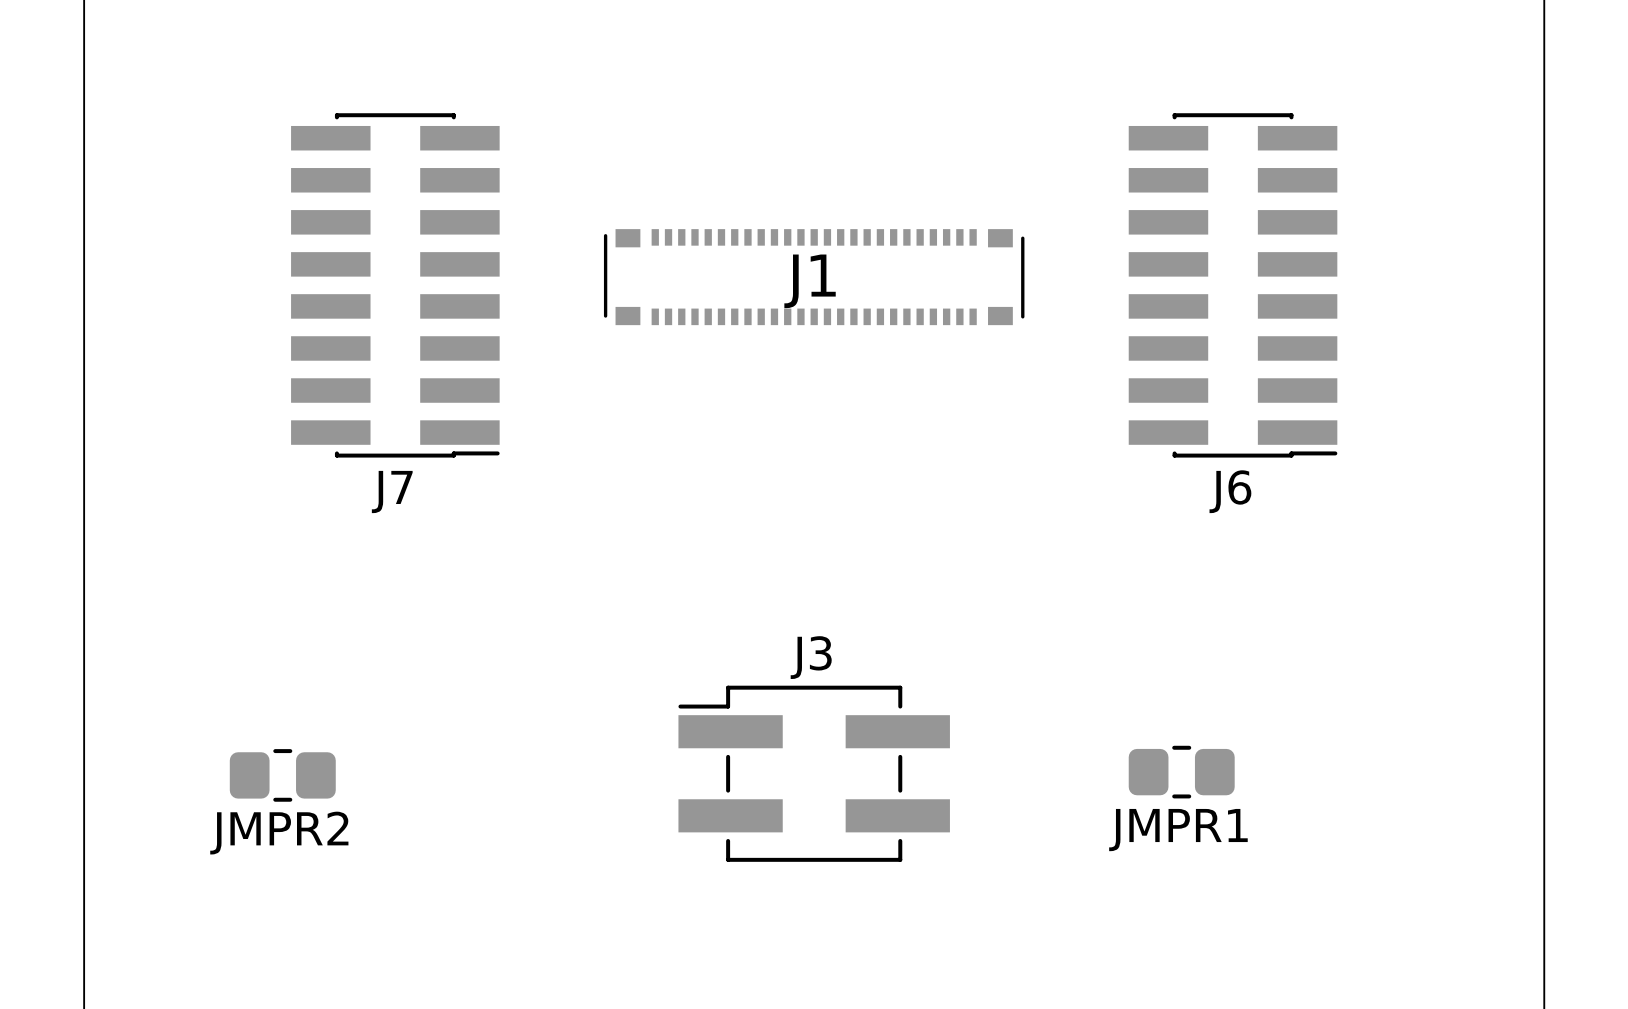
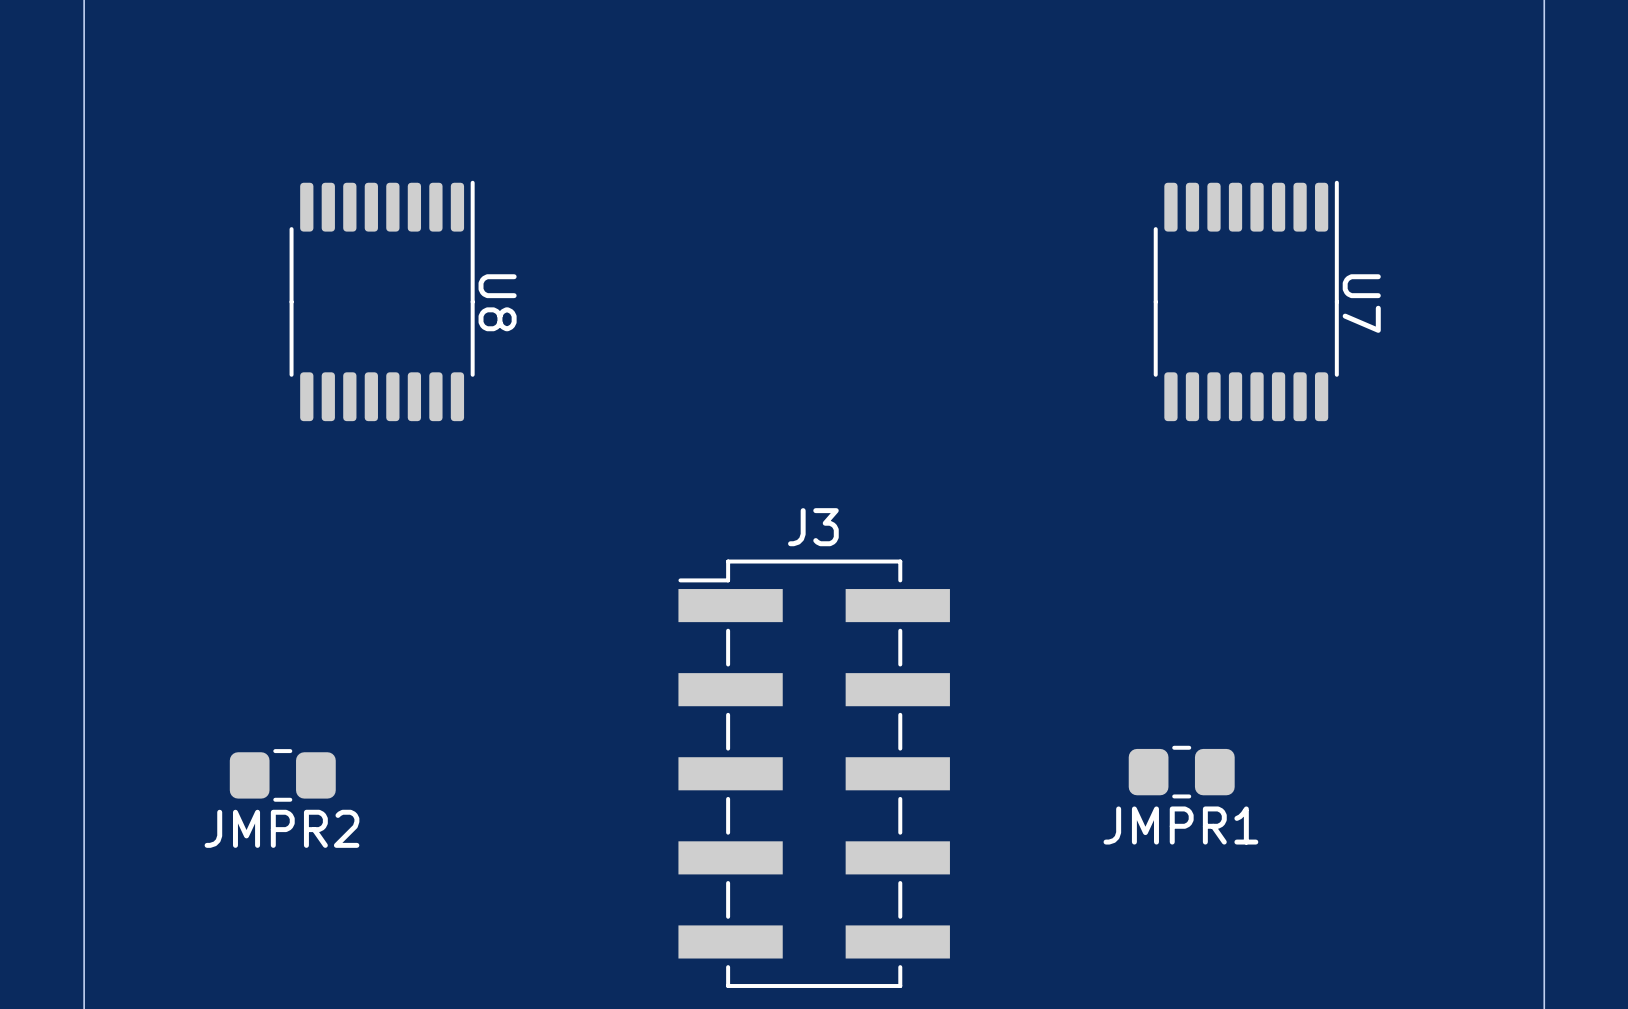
J1: (814, 277) -> none
J7: (395, 285) -> none
J6: (1233, 285) -> none
U8: none -> (382, 300)
U7: none -> (1246, 300)
J3 name position: J3 (811, 657) -> J3 (813, 527)
J3 footprint: [678, 685, 950, 862] -> [678, 559, 950, 988]

